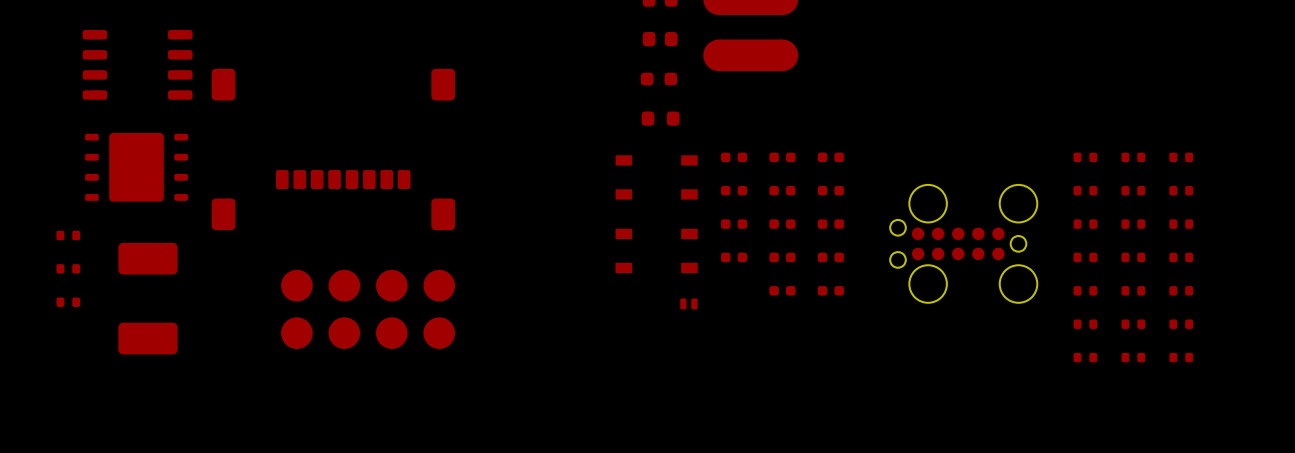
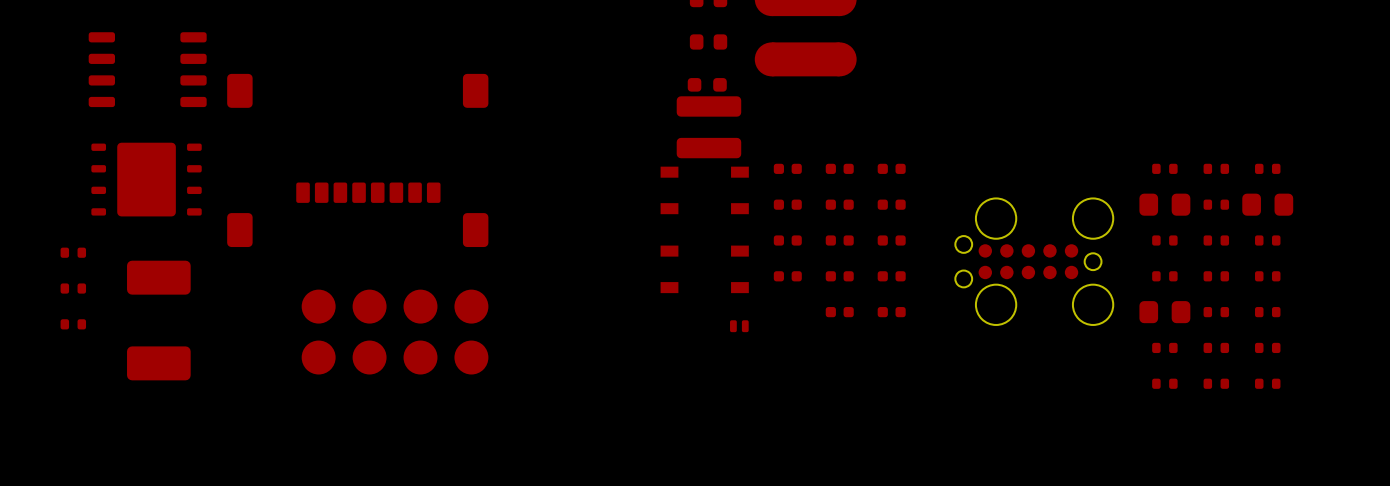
part footprint: [641, 111, 680, 126] -> [676, 96, 742, 159]
part footprint: [1073, 185, 1098, 196] -> [1139, 193, 1191, 216]
part footprint: [1169, 185, 1194, 196] -> [1242, 193, 1294, 216]
part footprint: [1073, 286, 1098, 296] -> [1139, 301, 1191, 324]

